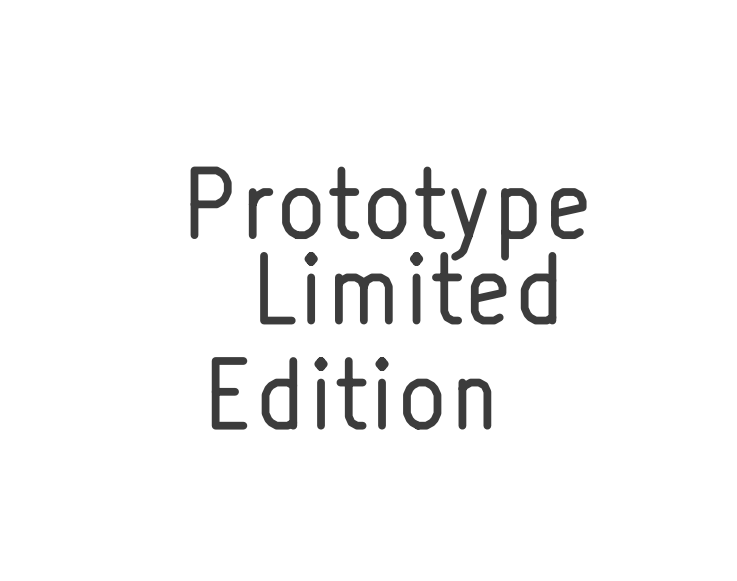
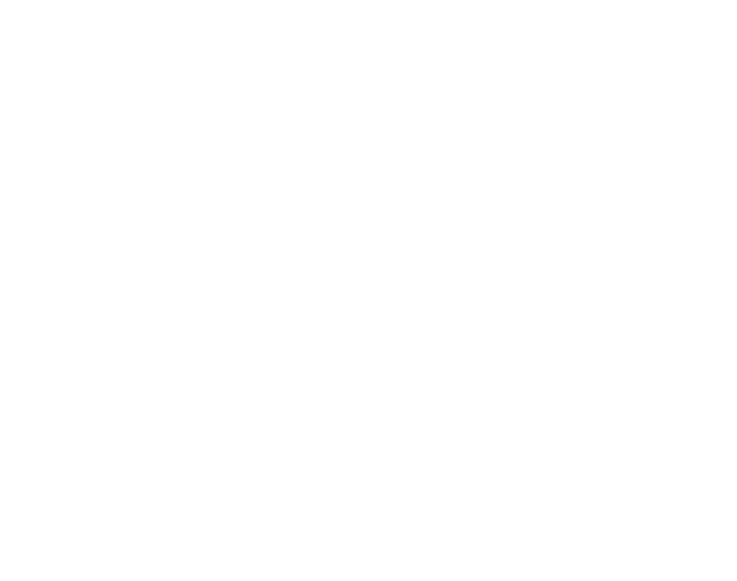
text: Prototype (388, 213) -> none
text: Limited (408, 288) -> none
text: Edition (351, 393) -> none

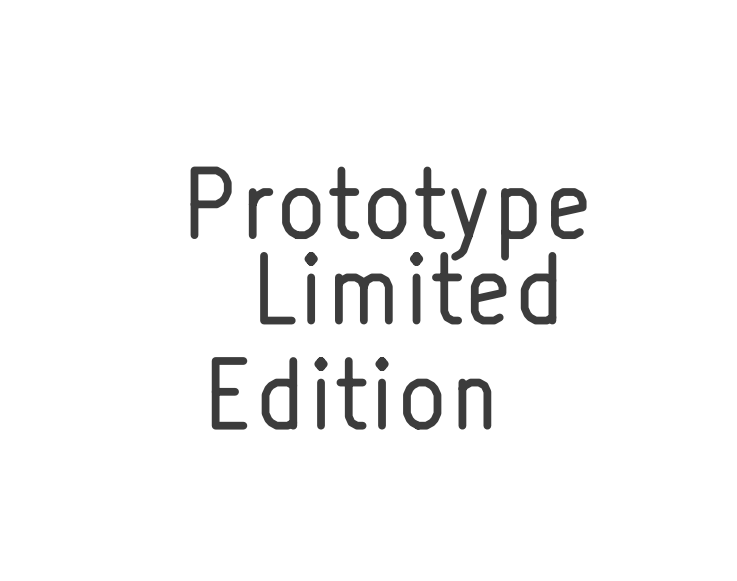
text: none -> Prototype (388, 213)
text: none -> Limited (408, 288)
text: none -> Edition (351, 393)

